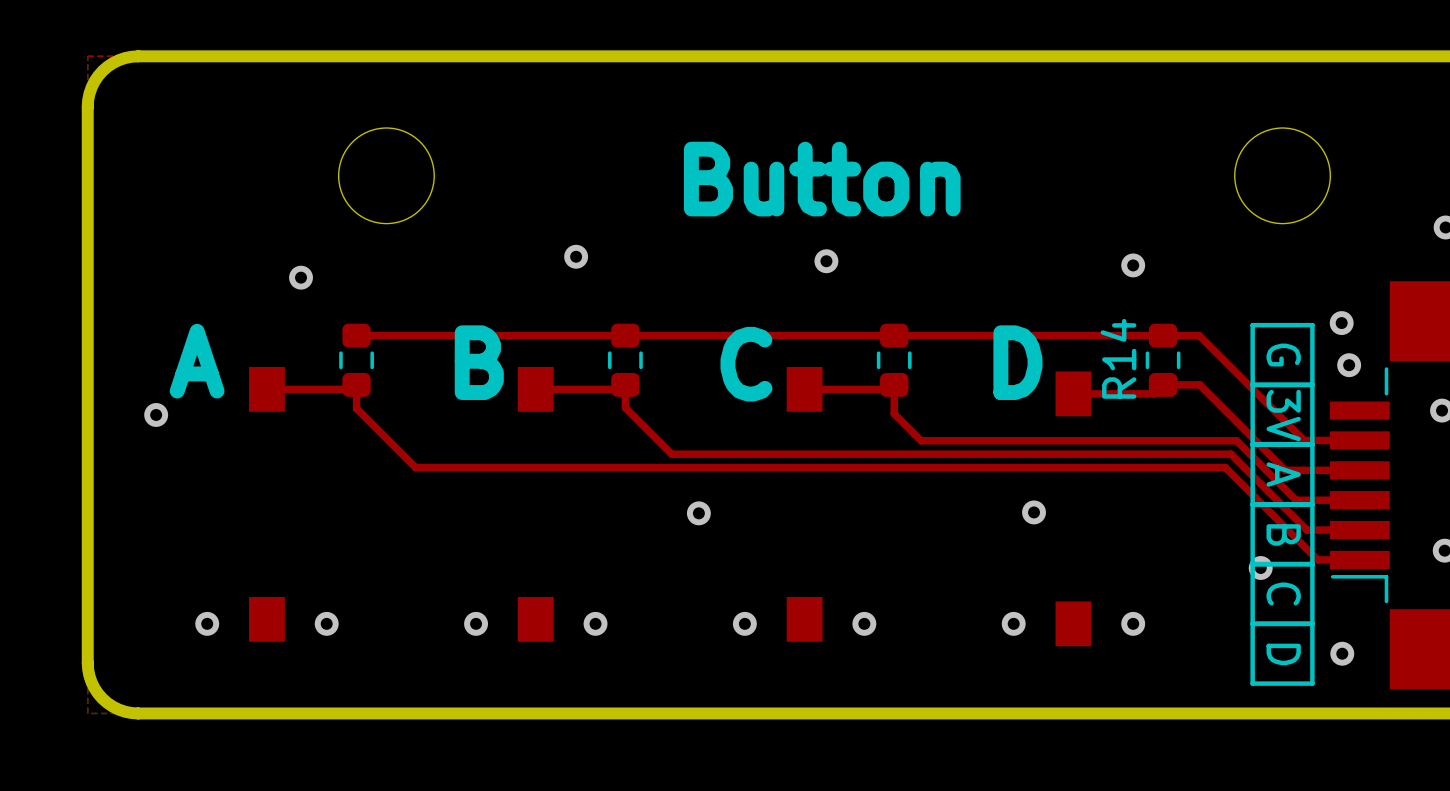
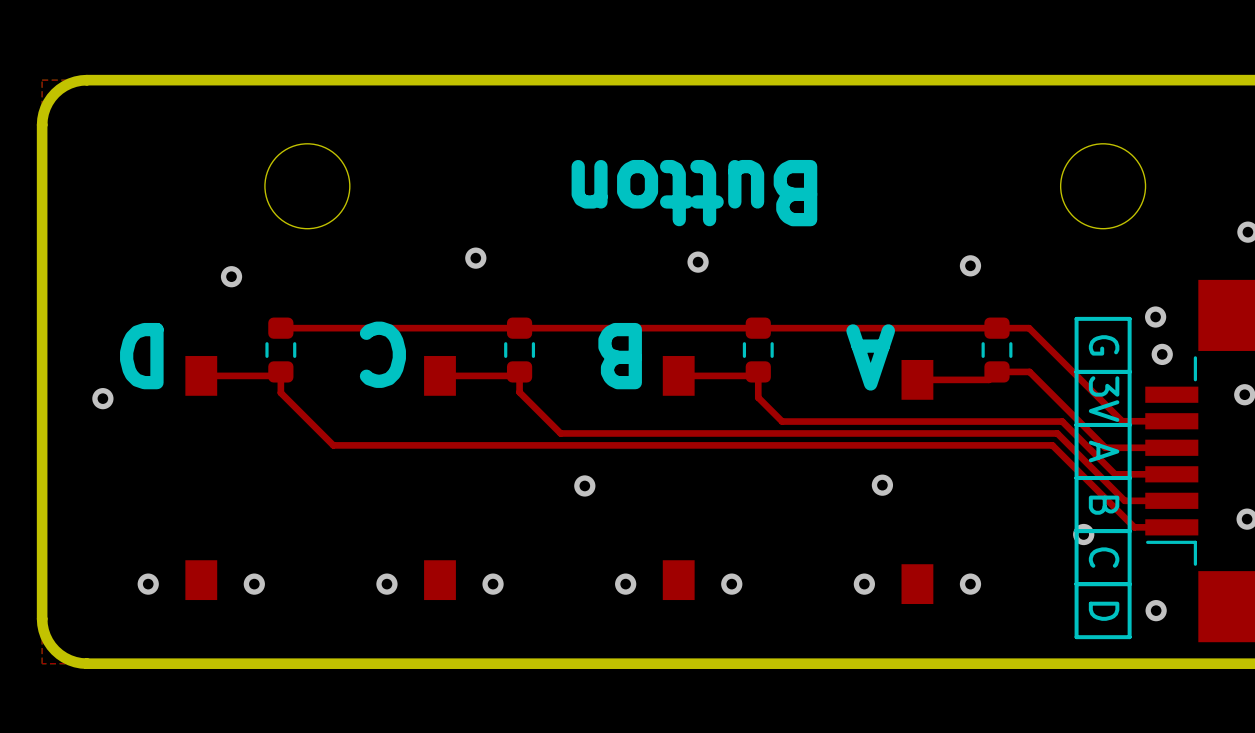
text rotation: 0° (822, 179) -> 180° (694, 193)
R14 name: R14 (1118, 358) -> none
text: A (197, 361) -> D (141, 356)
text: B (479, 362) -> C (382, 354)
text: D (1017, 362) -> A (870, 357)
text: C (746, 364) -> B (620, 356)

